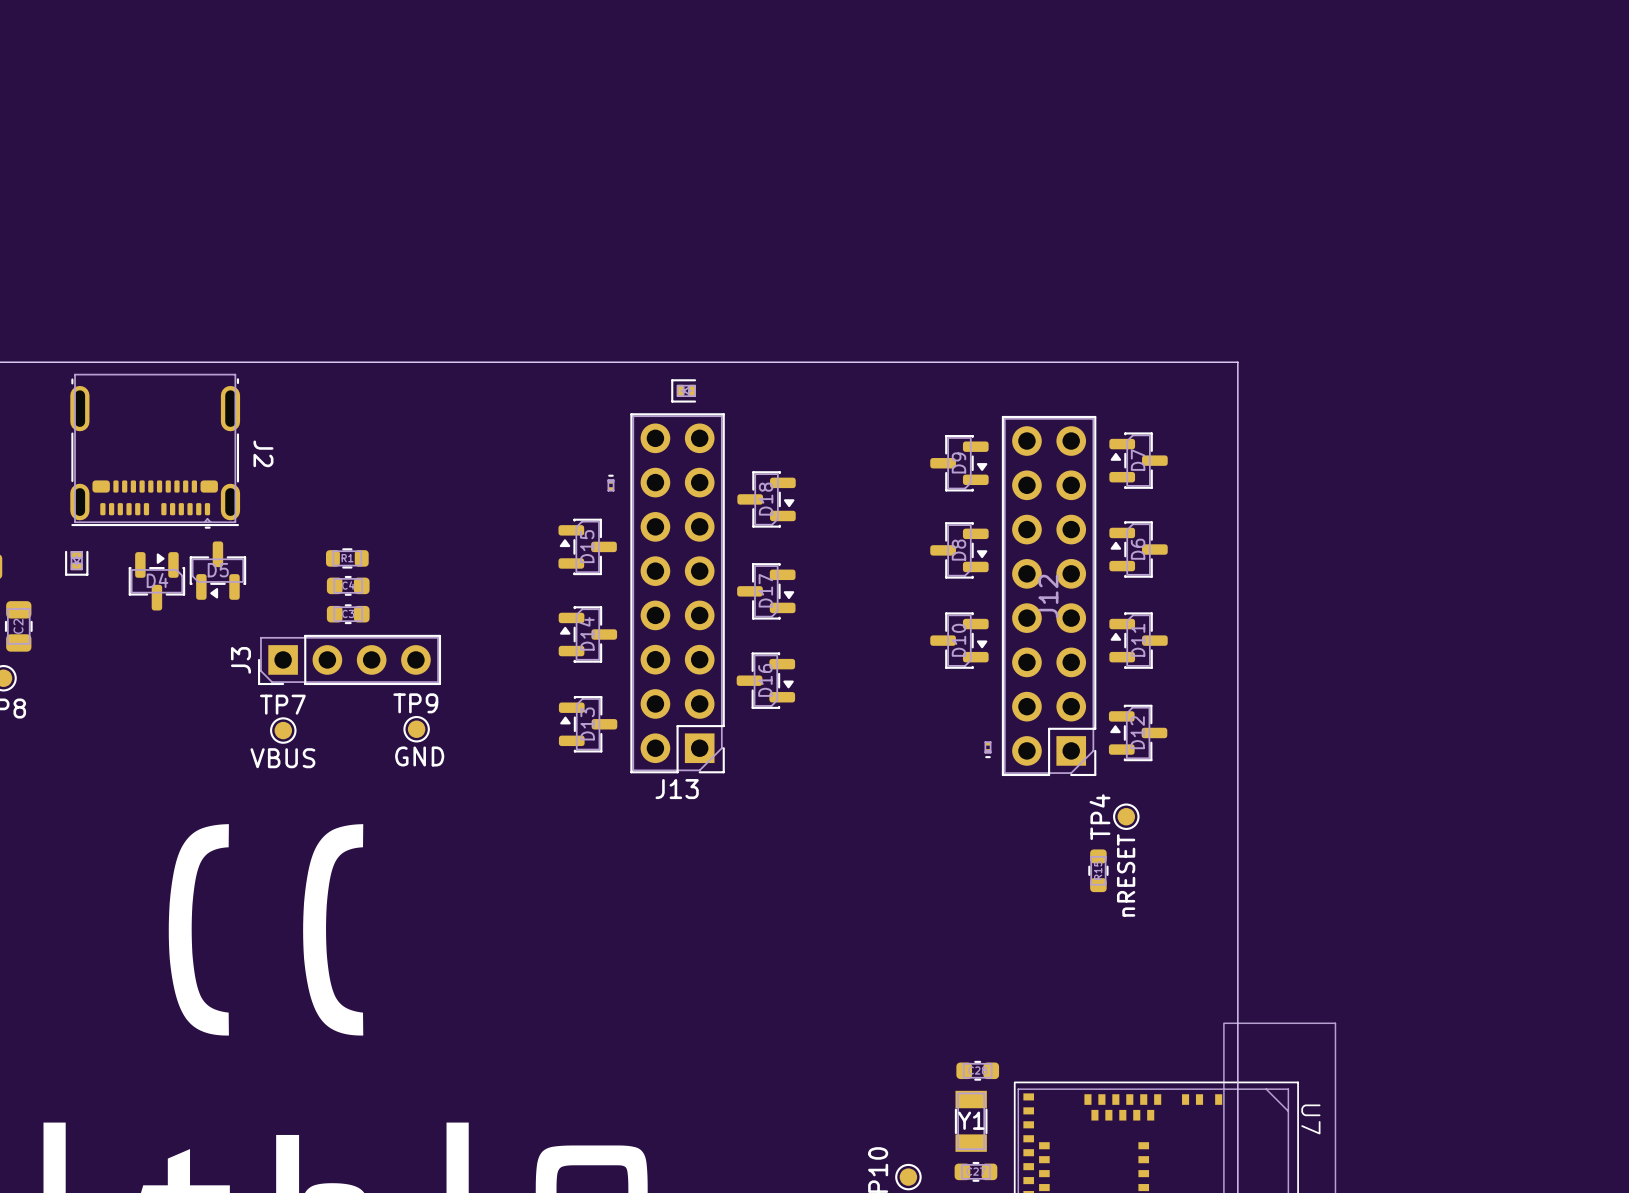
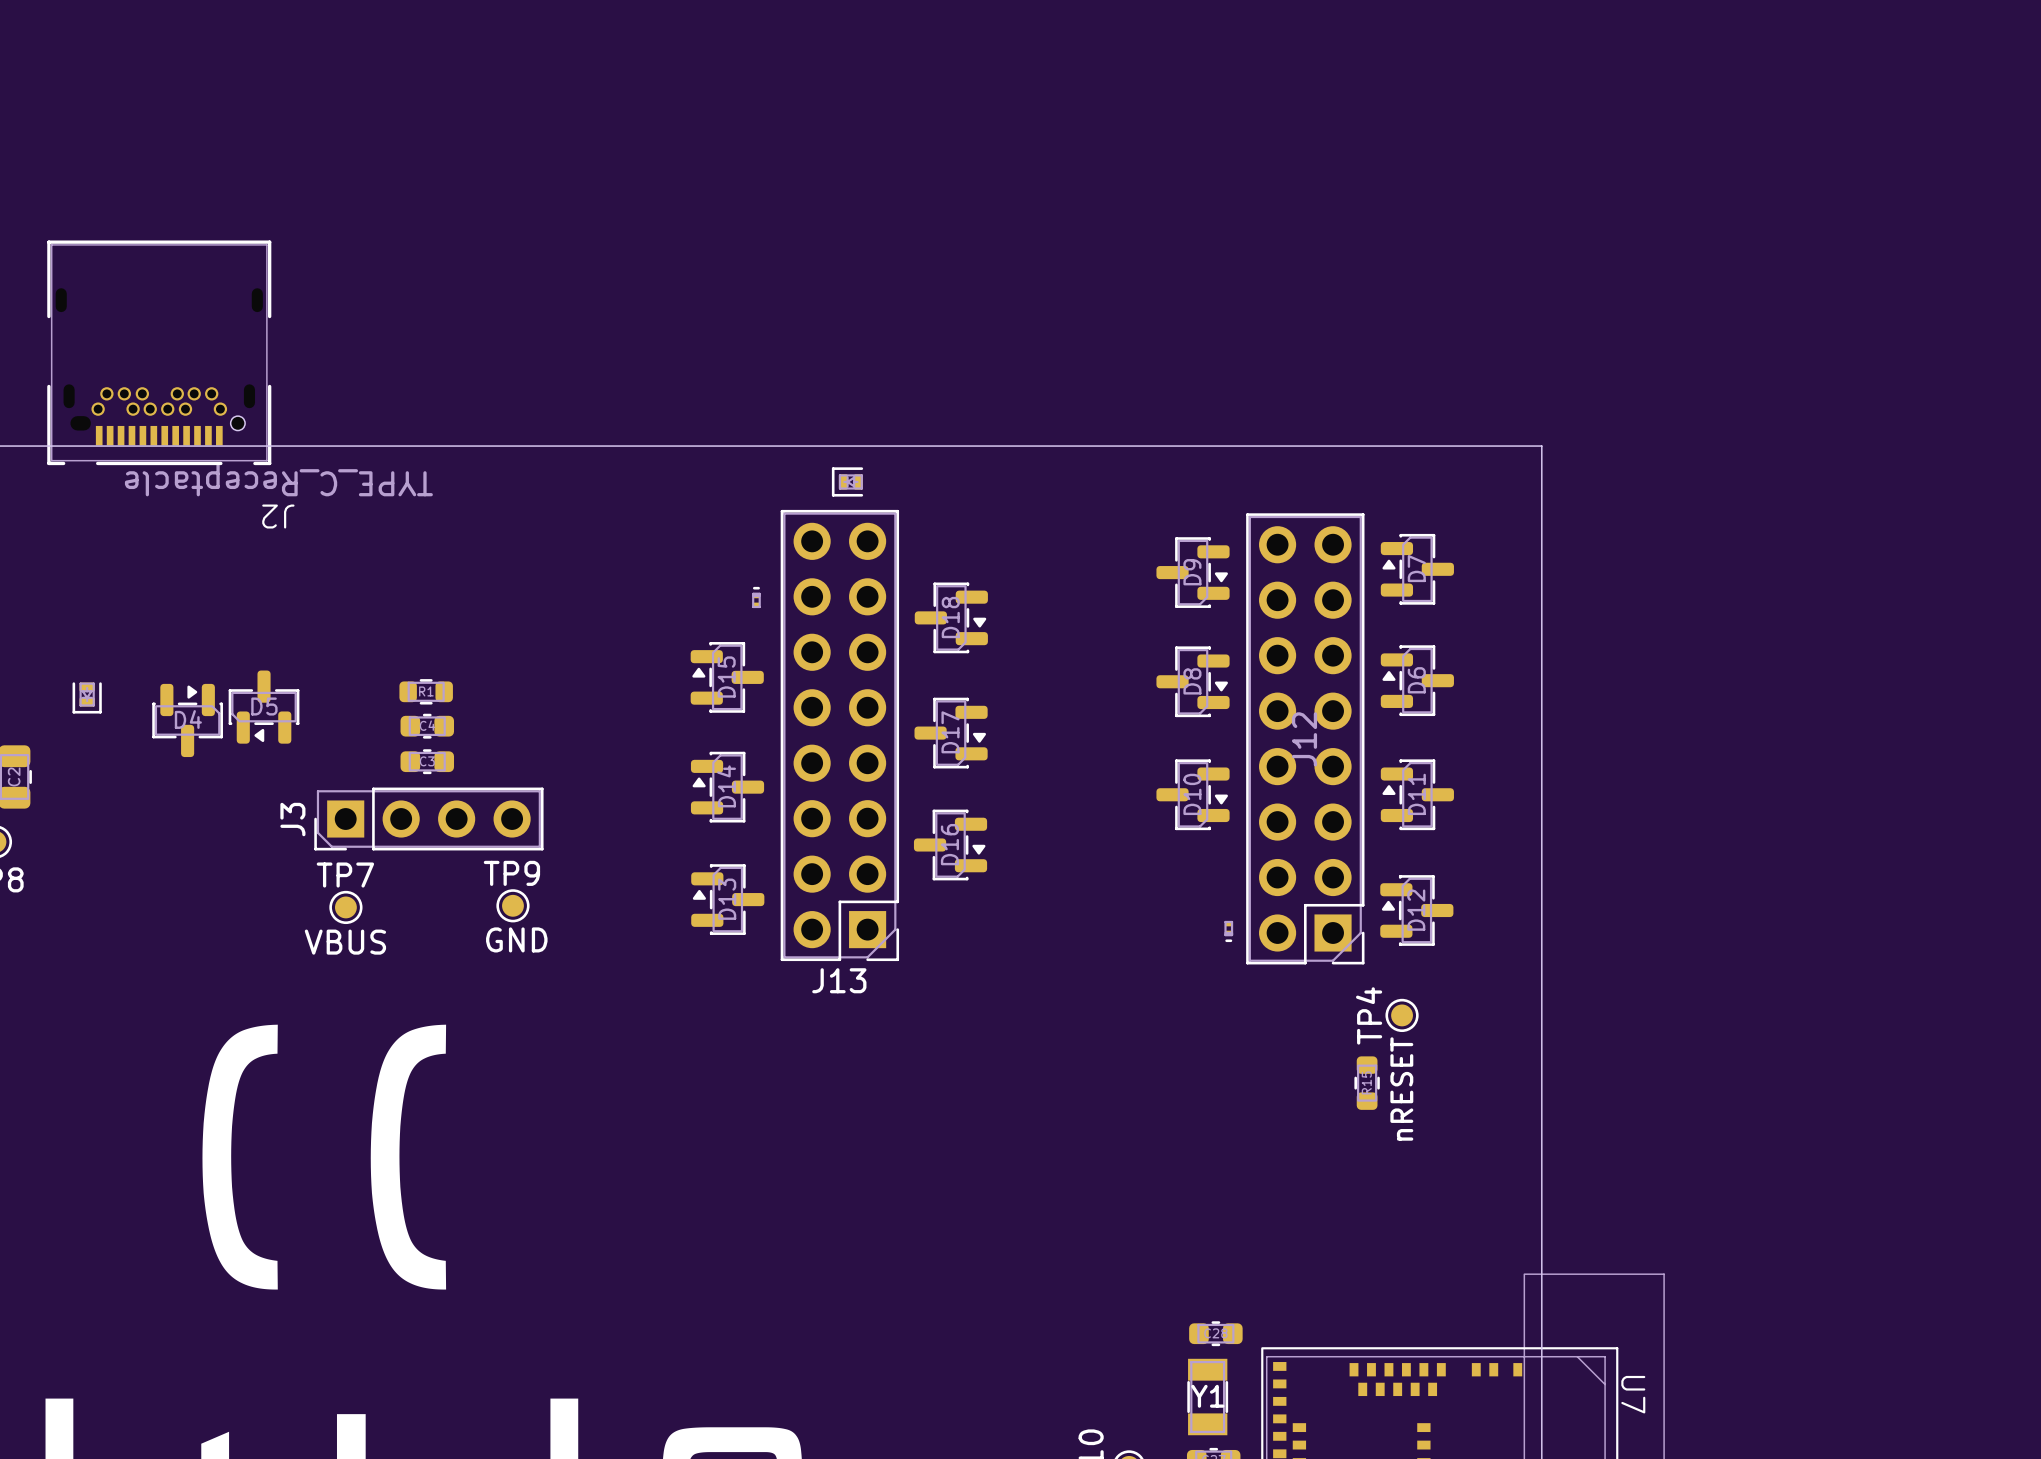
J2 footprint: [70, 373, 241, 529] -> [47, 240, 272, 466]
J2 value: none -> TYPE_C_Receptacle (278, 480)
J2 name position: J2 (263, 453) -> J2 (278, 516)

